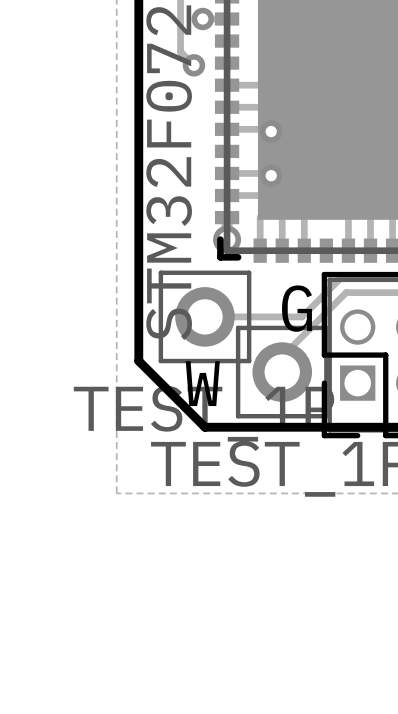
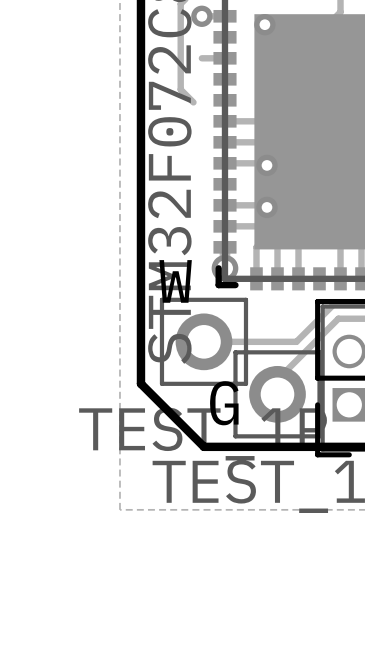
via: (202, 19) -> none
via: (193, 65) -> none
text position: G (296, 308) -> G (224, 403)
text position: W (202, 383) -> W (175, 281)

